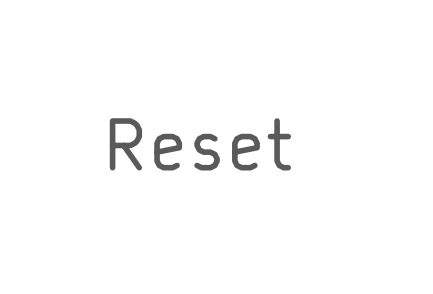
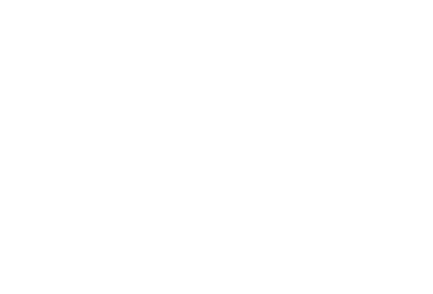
text: Reset (200, 144) -> none

